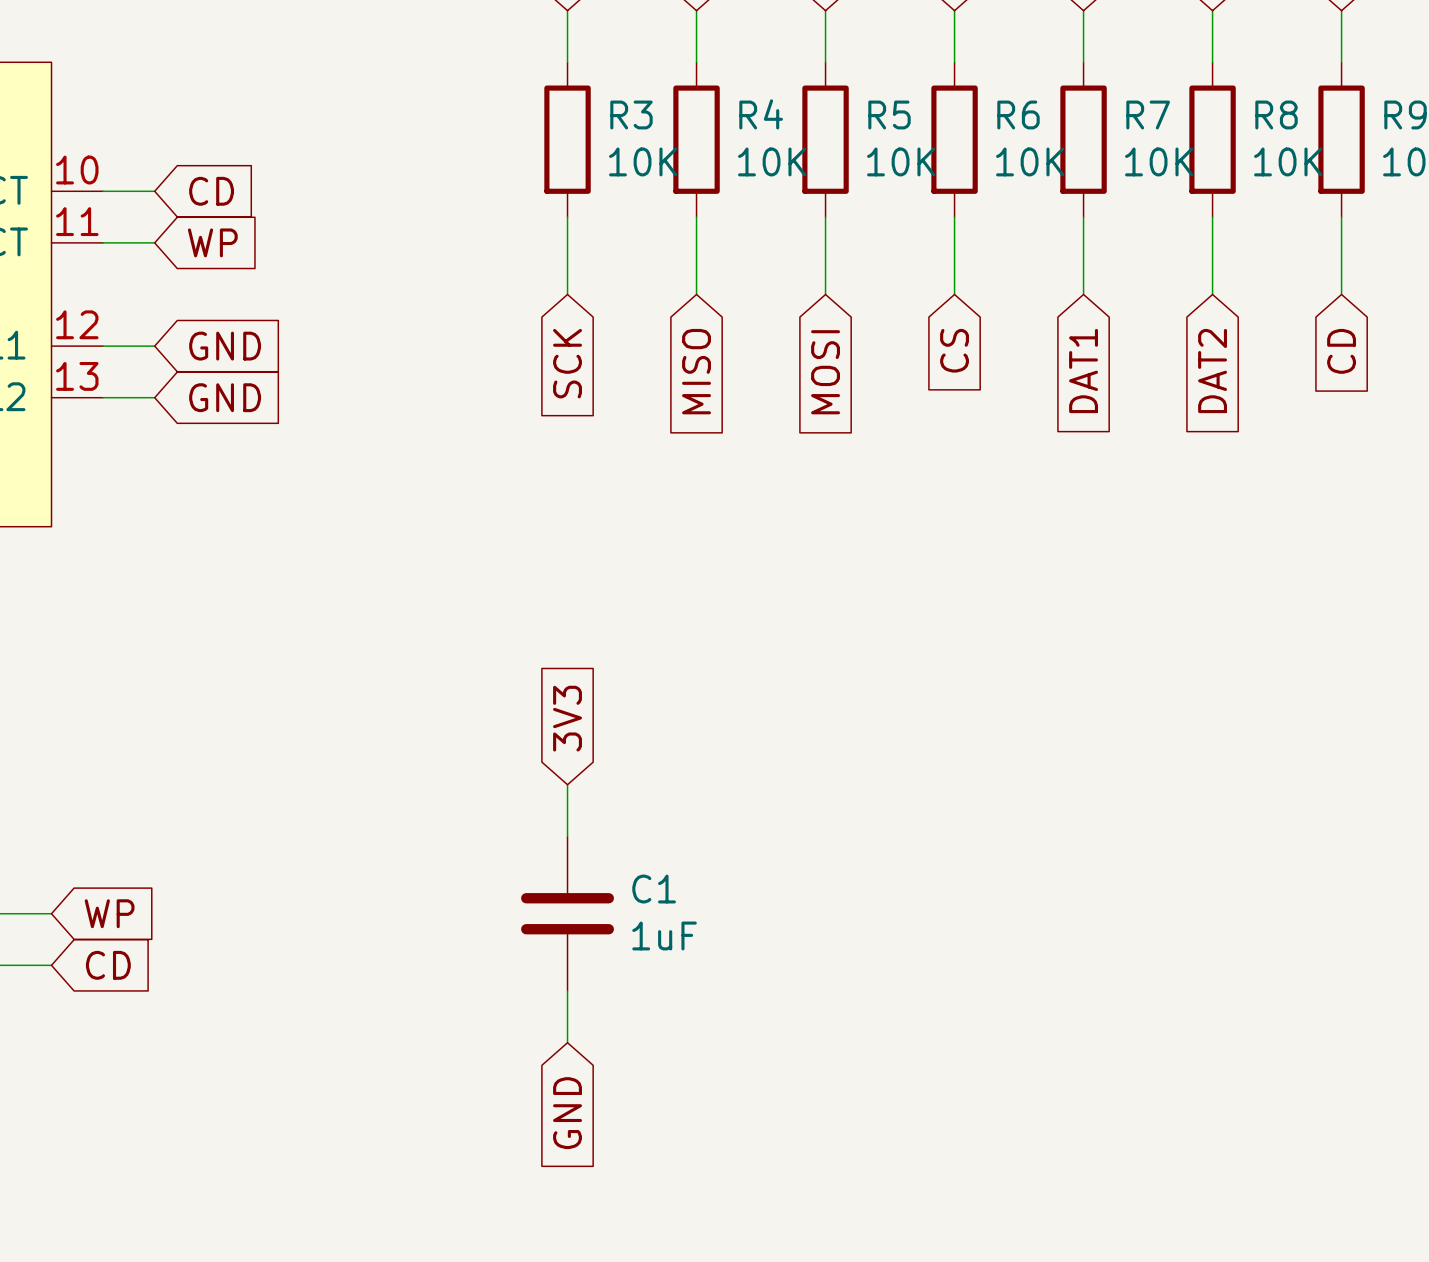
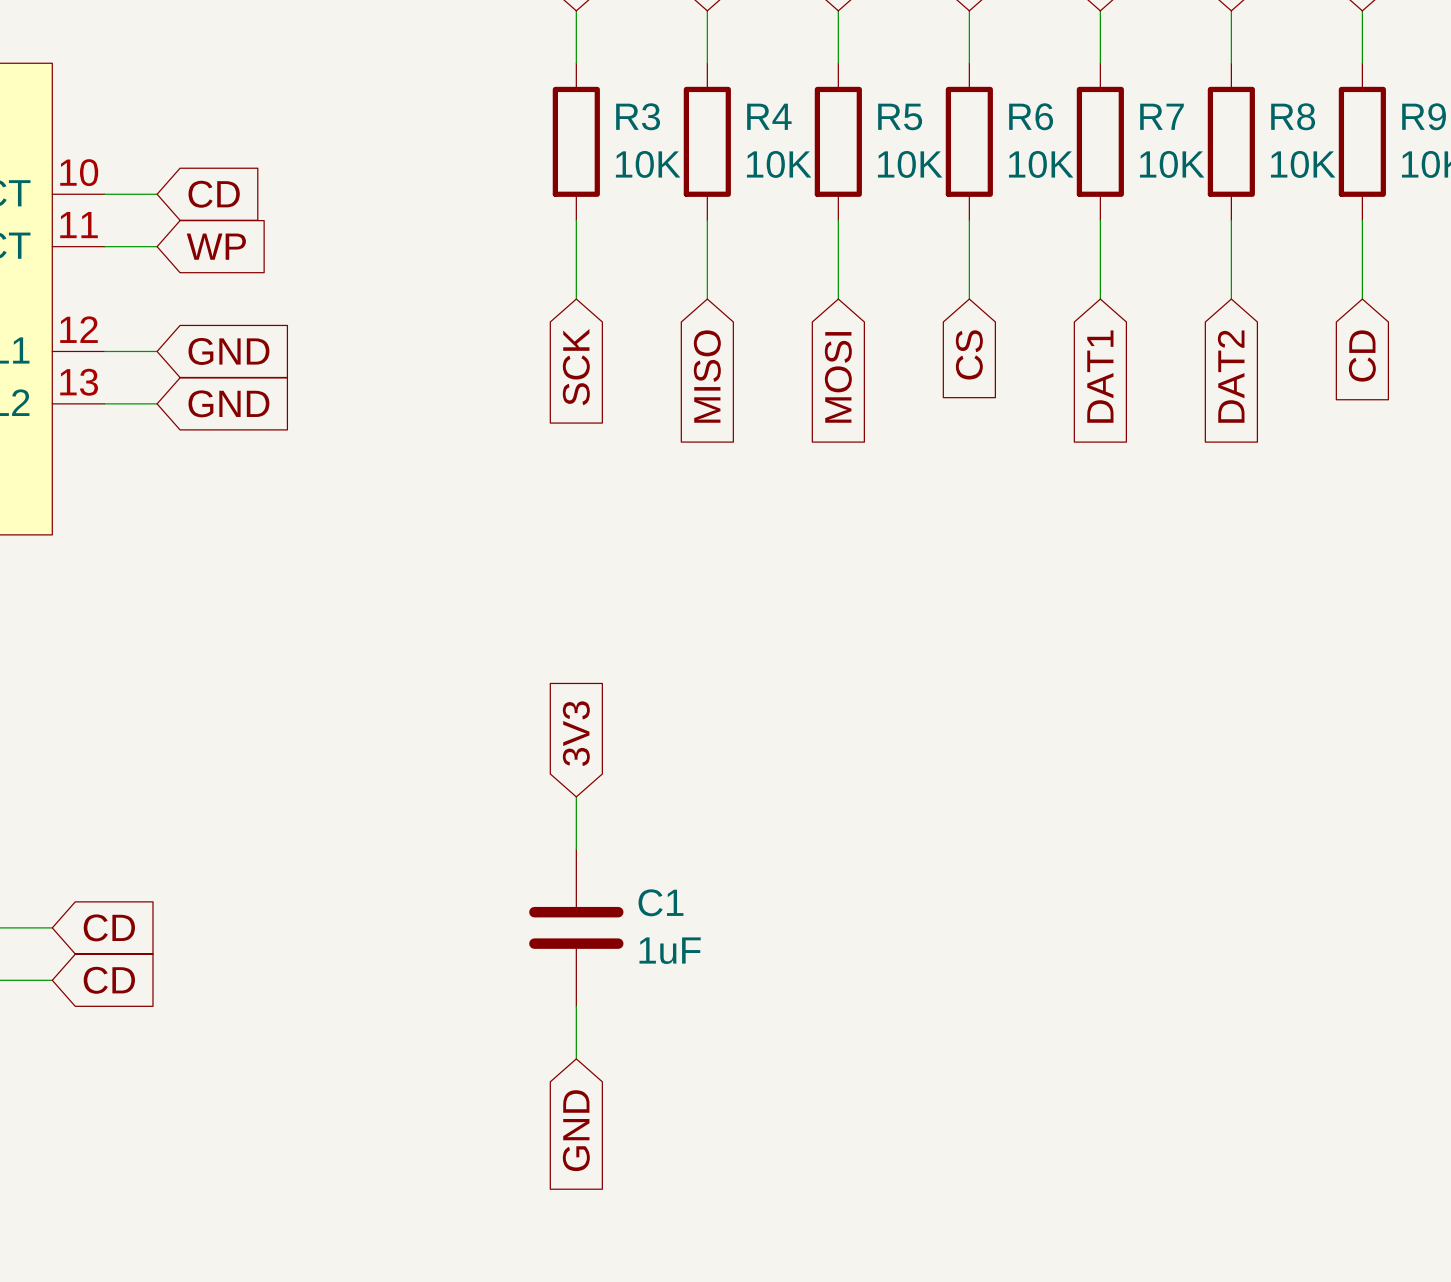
global label: WP (109, 913) -> CD (109, 927)

